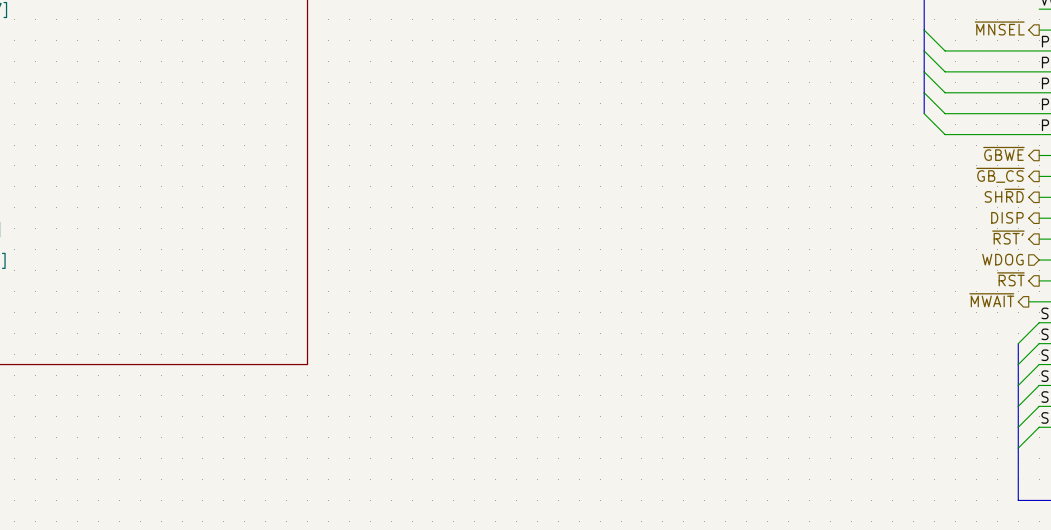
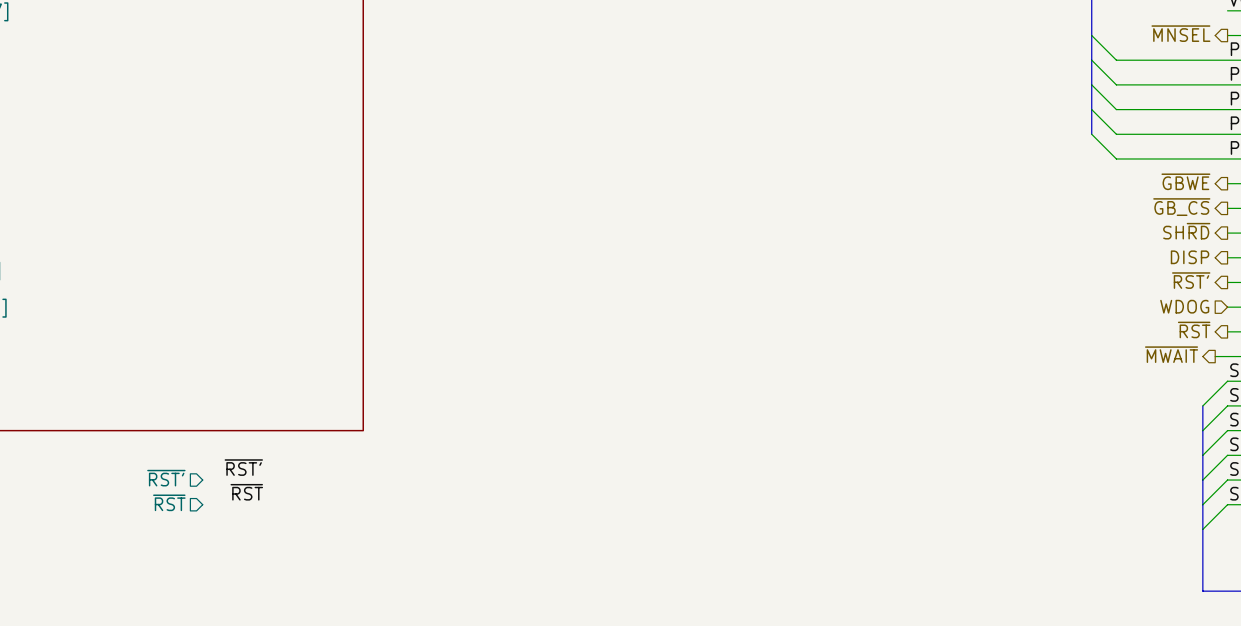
label: none -> ~{RST'} (243, 467)
sheet pin: none -> ~{RST'} (166, 478)
label: none -> ~{RST} (246, 492)
sheet pin: none -> ~{RST} (169, 502)

